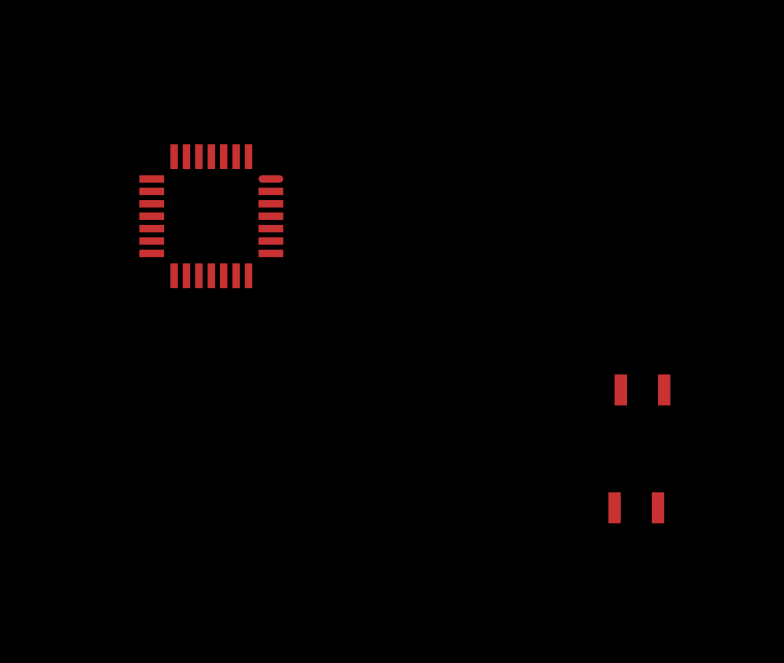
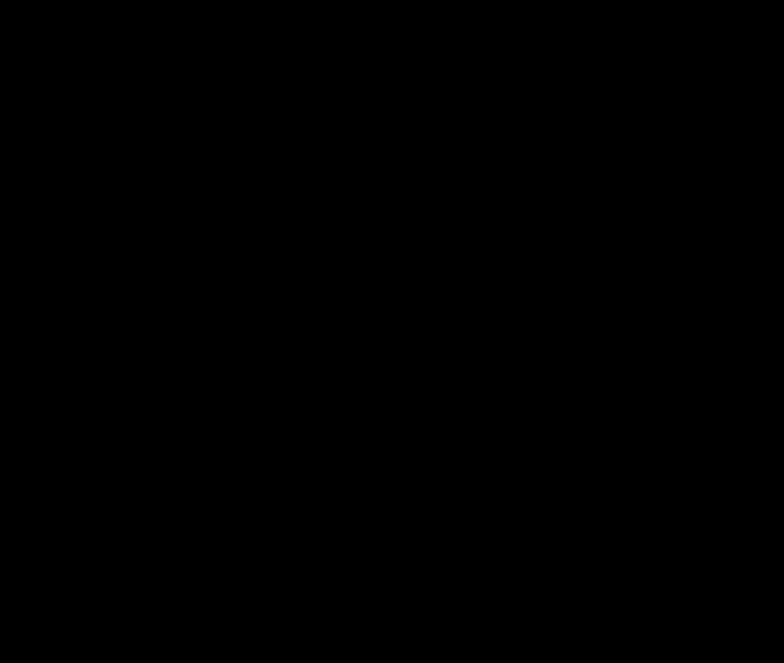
part: (211, 216) -> none
part: (642, 389) -> none
part: (636, 507) -> none

